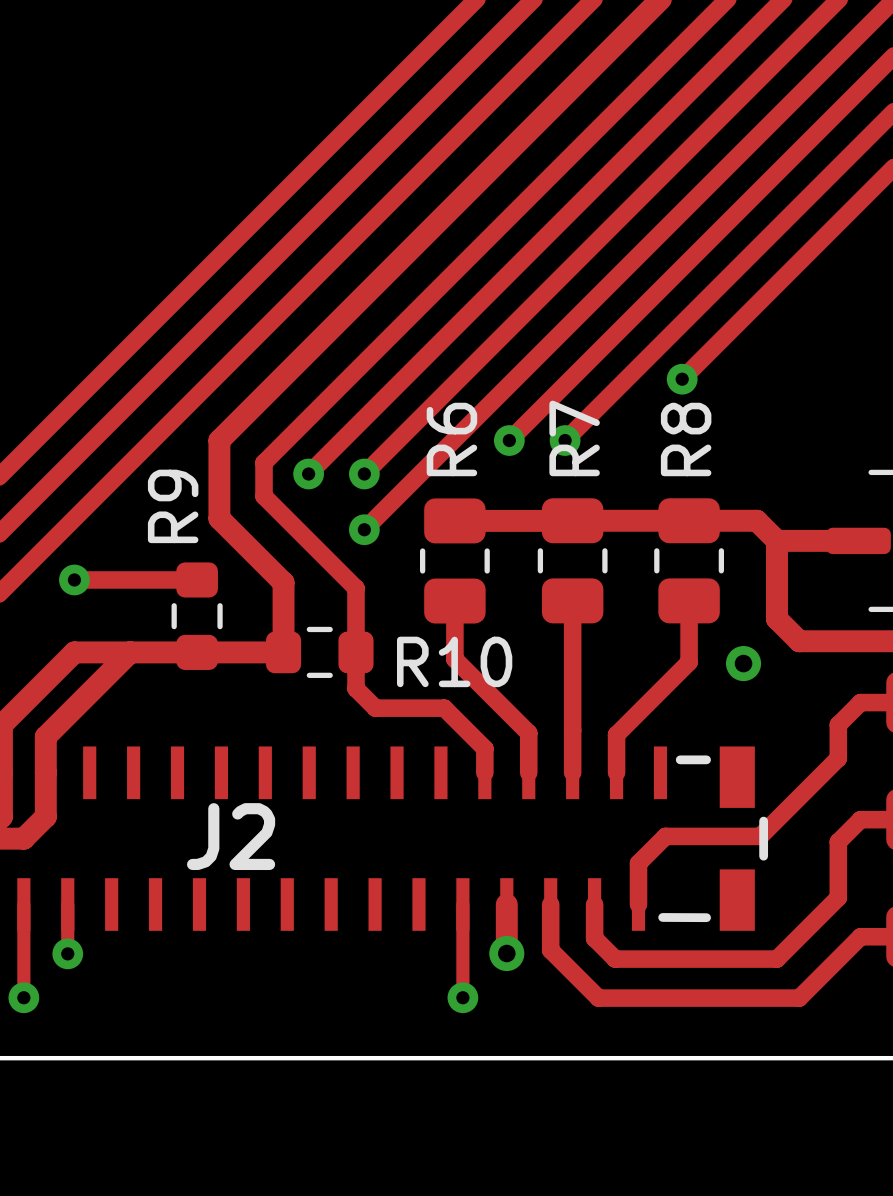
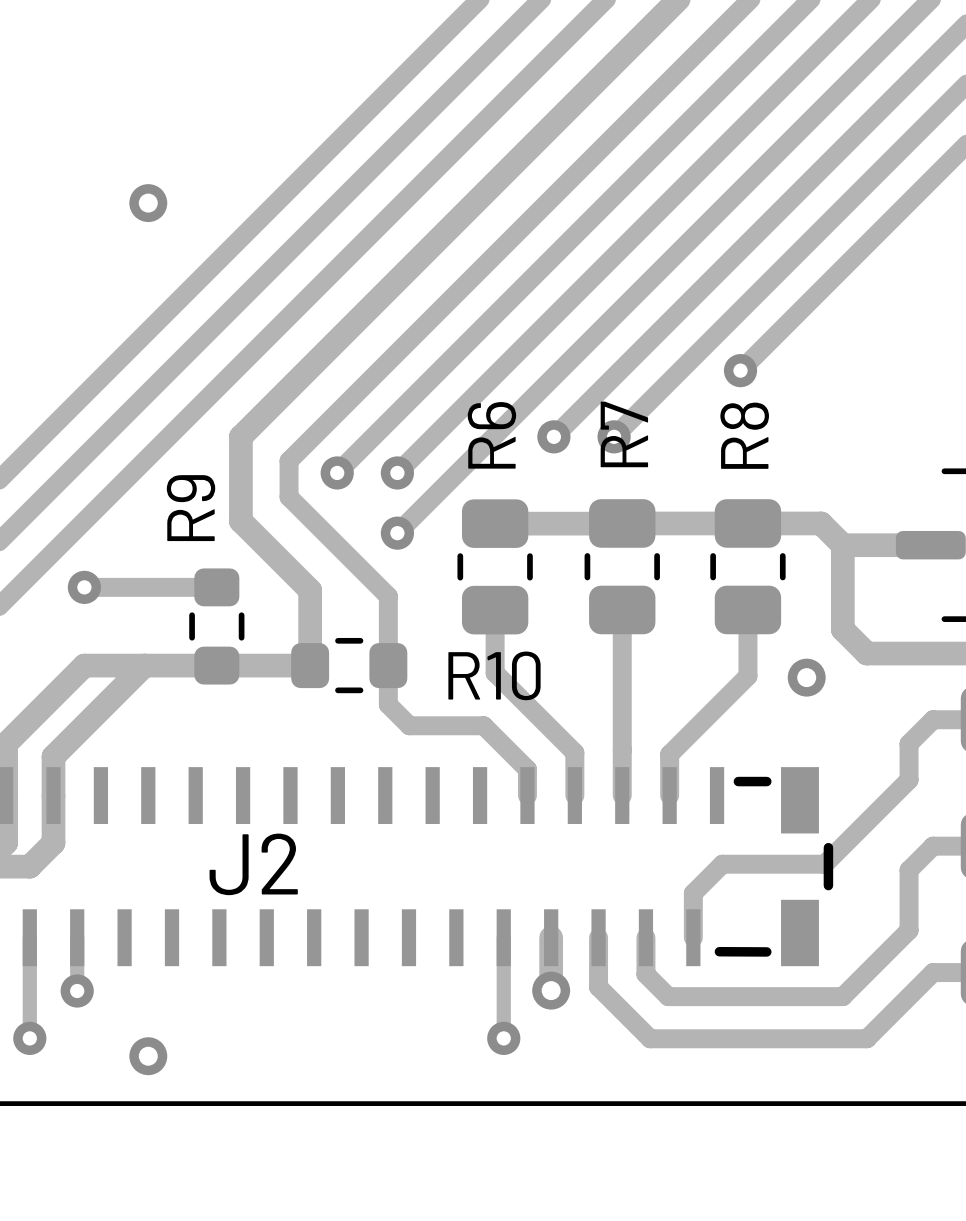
via: none -> (148, 203)
via: none -> (148, 1056)

